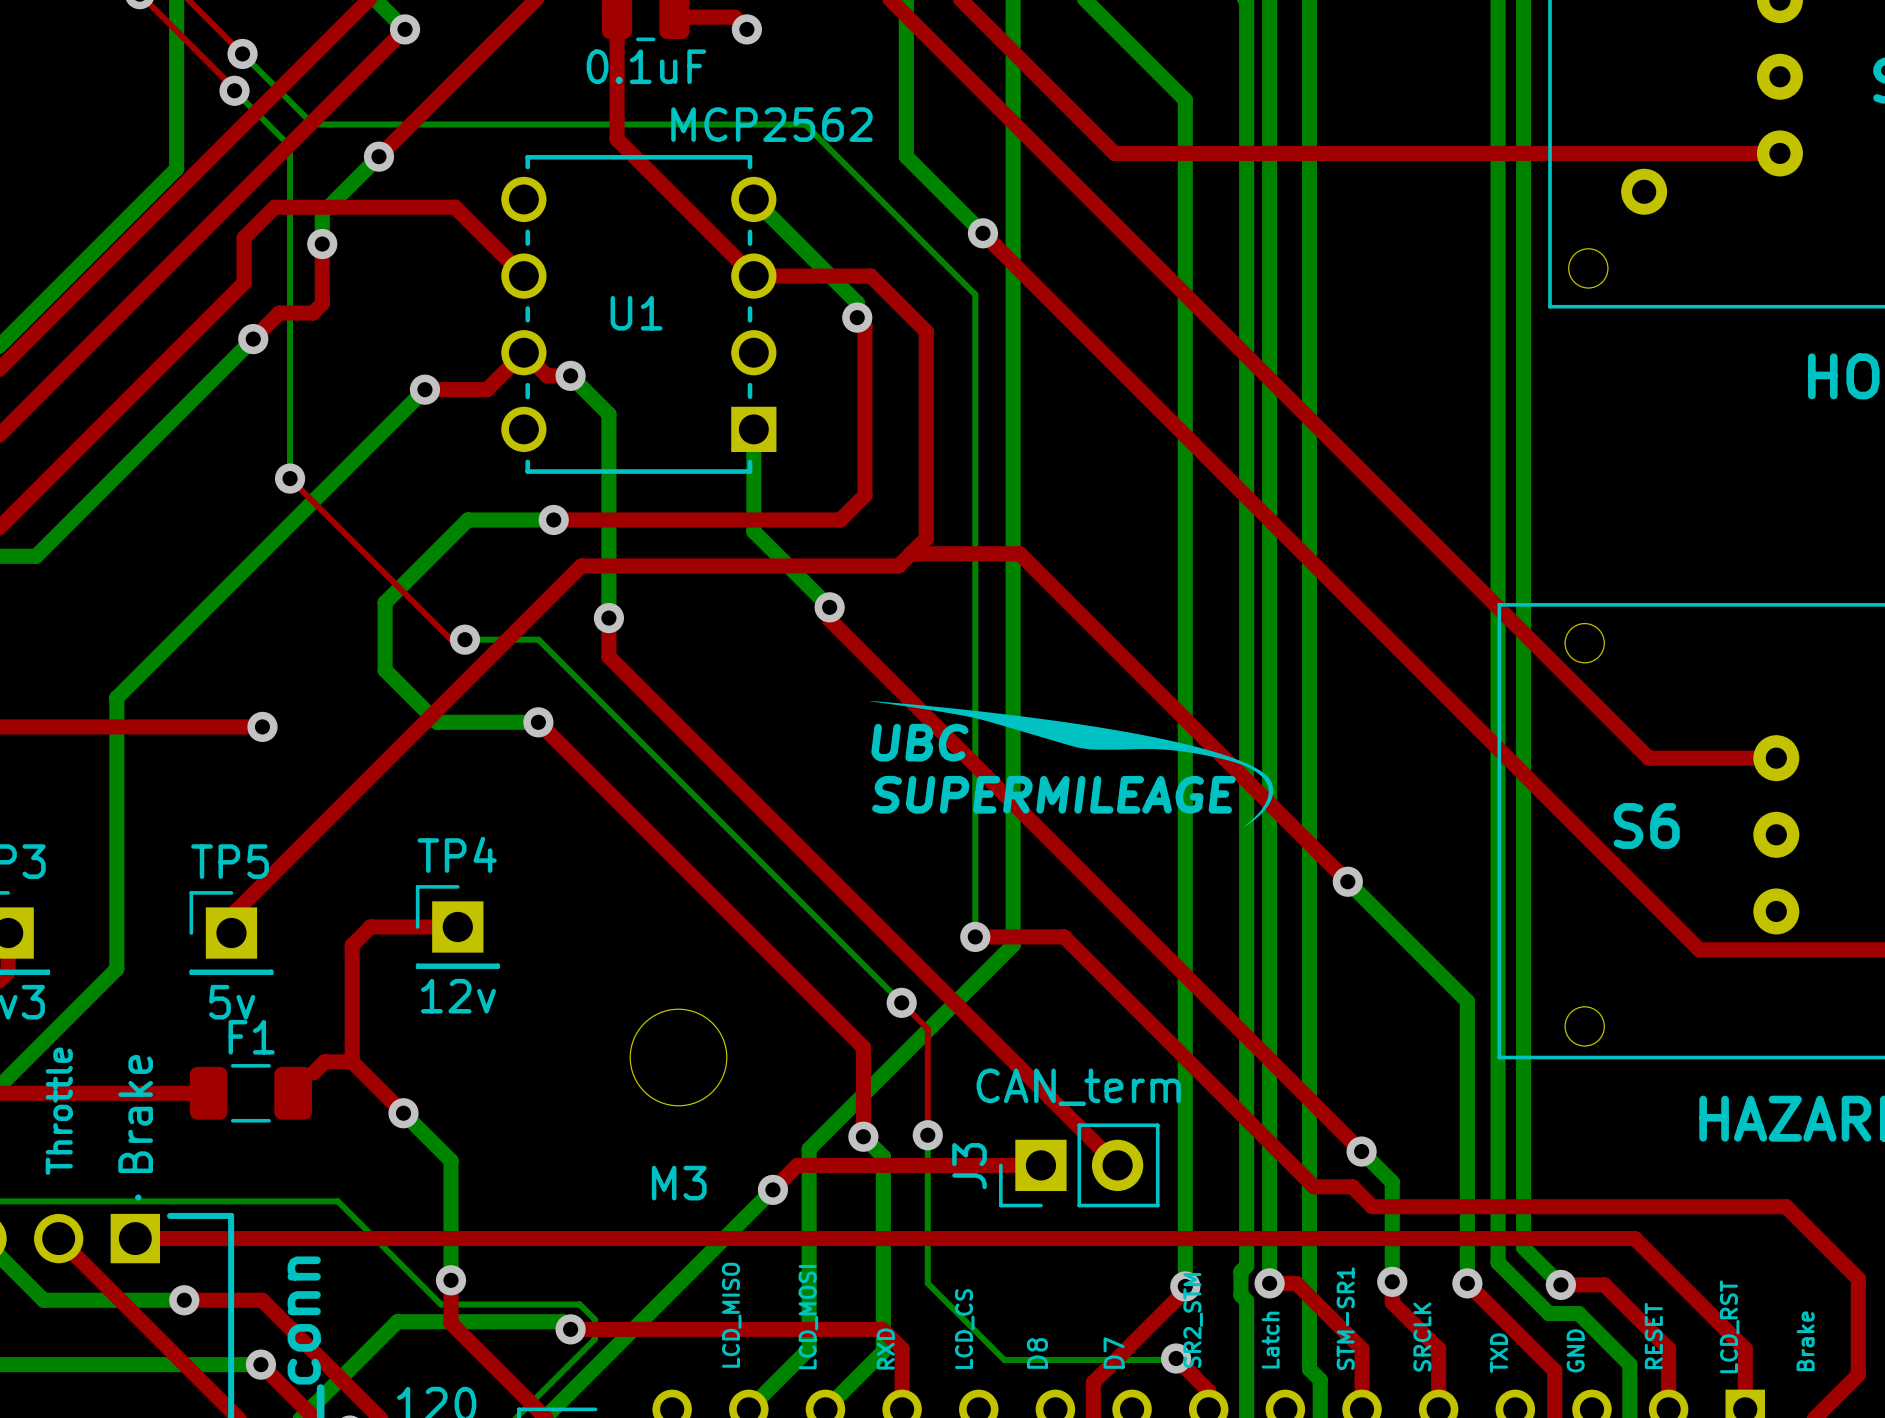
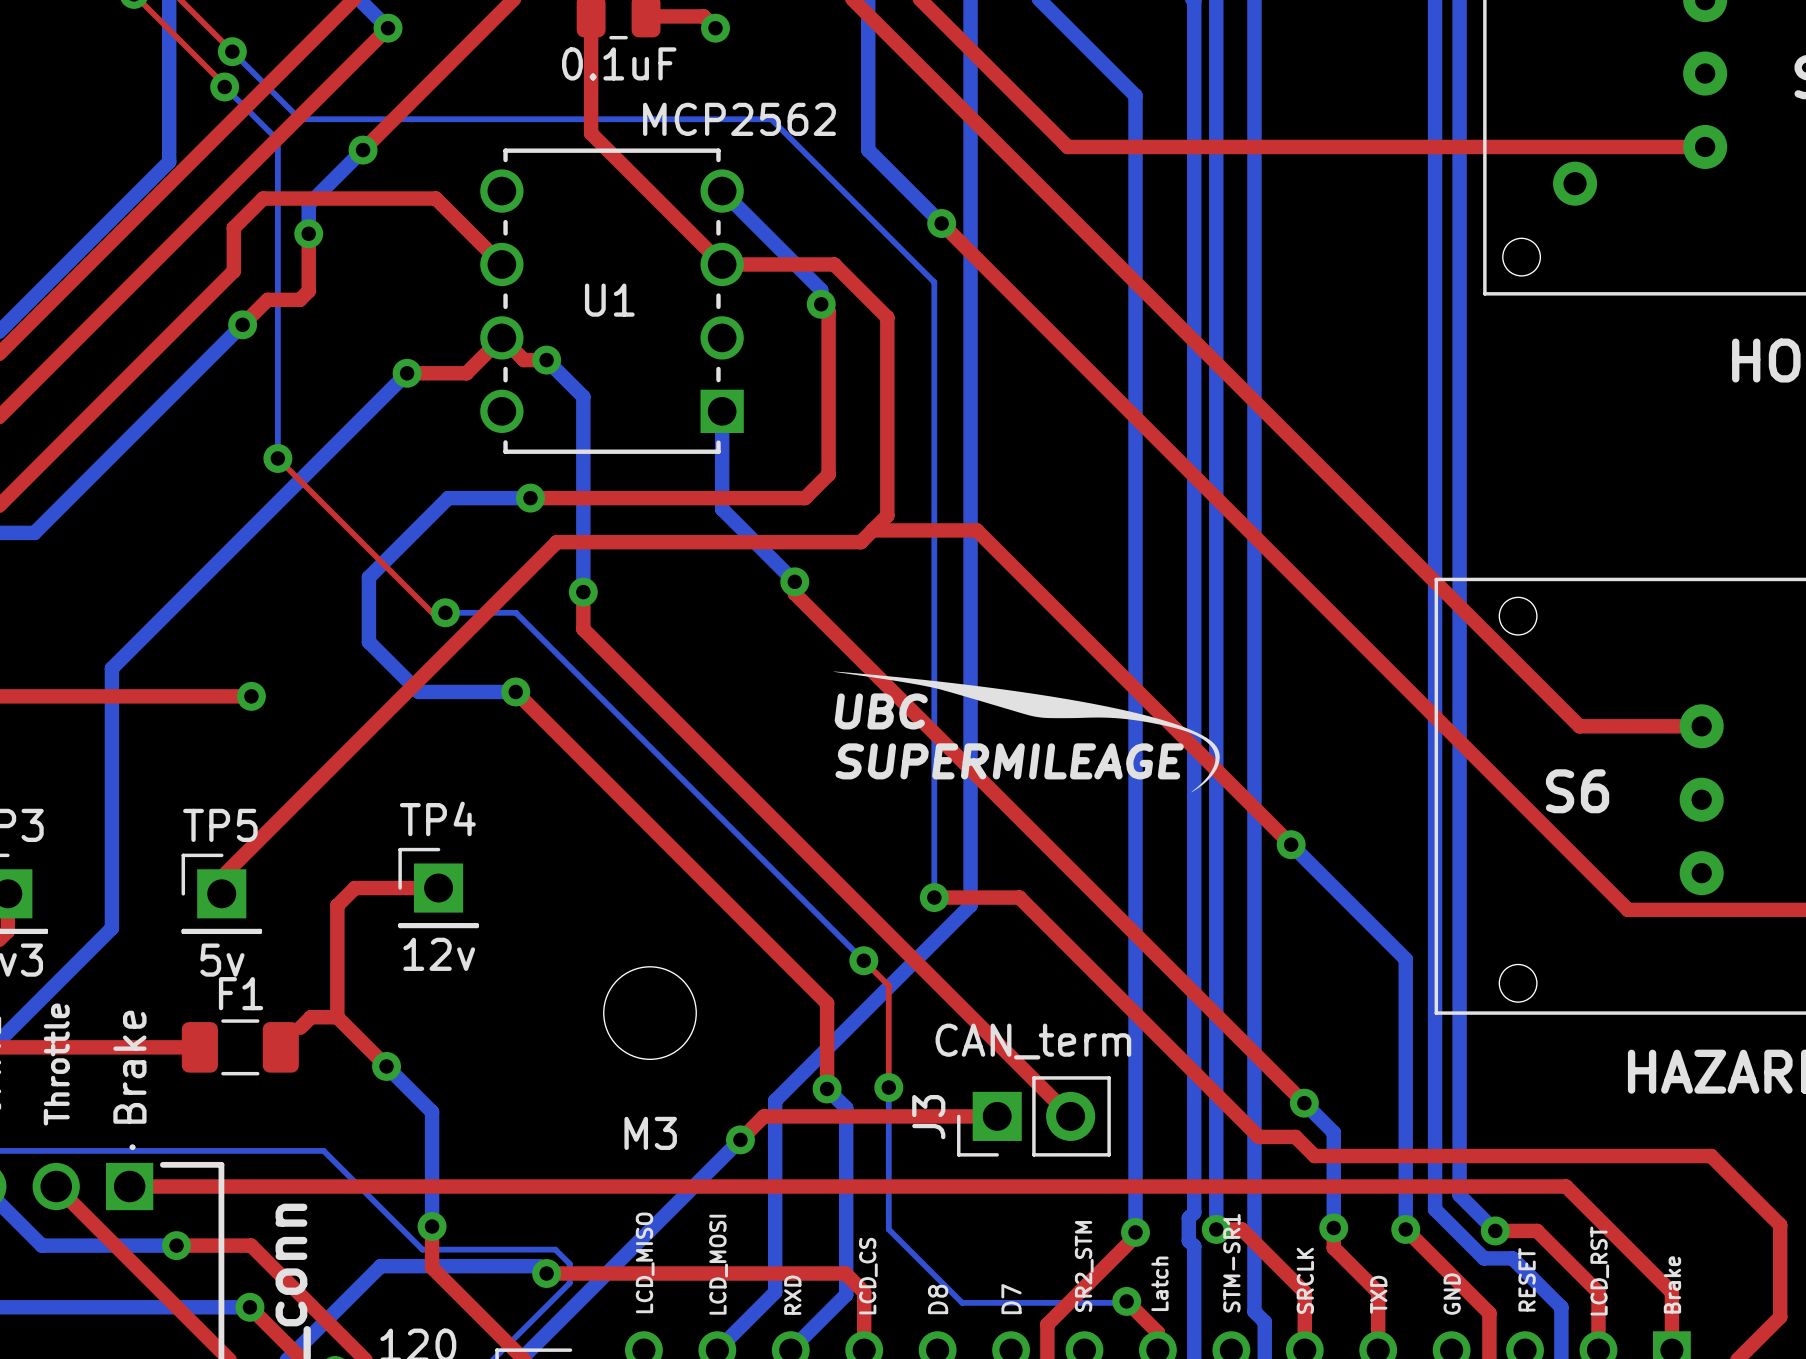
text position: LCD_MISO (731, 1315) -> LCD_MISO (645, 1262)
text position: LCD_MOSI (808, 1317) -> LCD_MOSI (718, 1264)
text position: STM-SR1 (1345, 1318) -> STM-SR1 (1231, 1263)
text position: SR2_STM (1193, 1320) -> SR2_STM (1084, 1266)
text position: LCD_RST (1729, 1326) -> LCD_RST (1599, 1271)
text position: LCD_CS (964, 1329) -> LCD_CS (868, 1276)
text position: RESET (1653, 1335) -> RESET (1527, 1279)
text position: SRCLK (1422, 1337) -> SRCLK (1305, 1280)
text position: Latch (1270, 1340) -> Latch (1159, 1283)
text position: Brake (1805, 1341) -> Brake (1672, 1284)
text position: RXD (885, 1348) -> RXD (792, 1295)
text position: GND (1575, 1350) -> GND (1452, 1294)
text position: D8 (1037, 1353) -> D8 (938, 1299)
text position: D7 (1114, 1353) -> D7 (1011, 1299)
text position: TXD (1499, 1353) -> TXD (1378, 1294)

